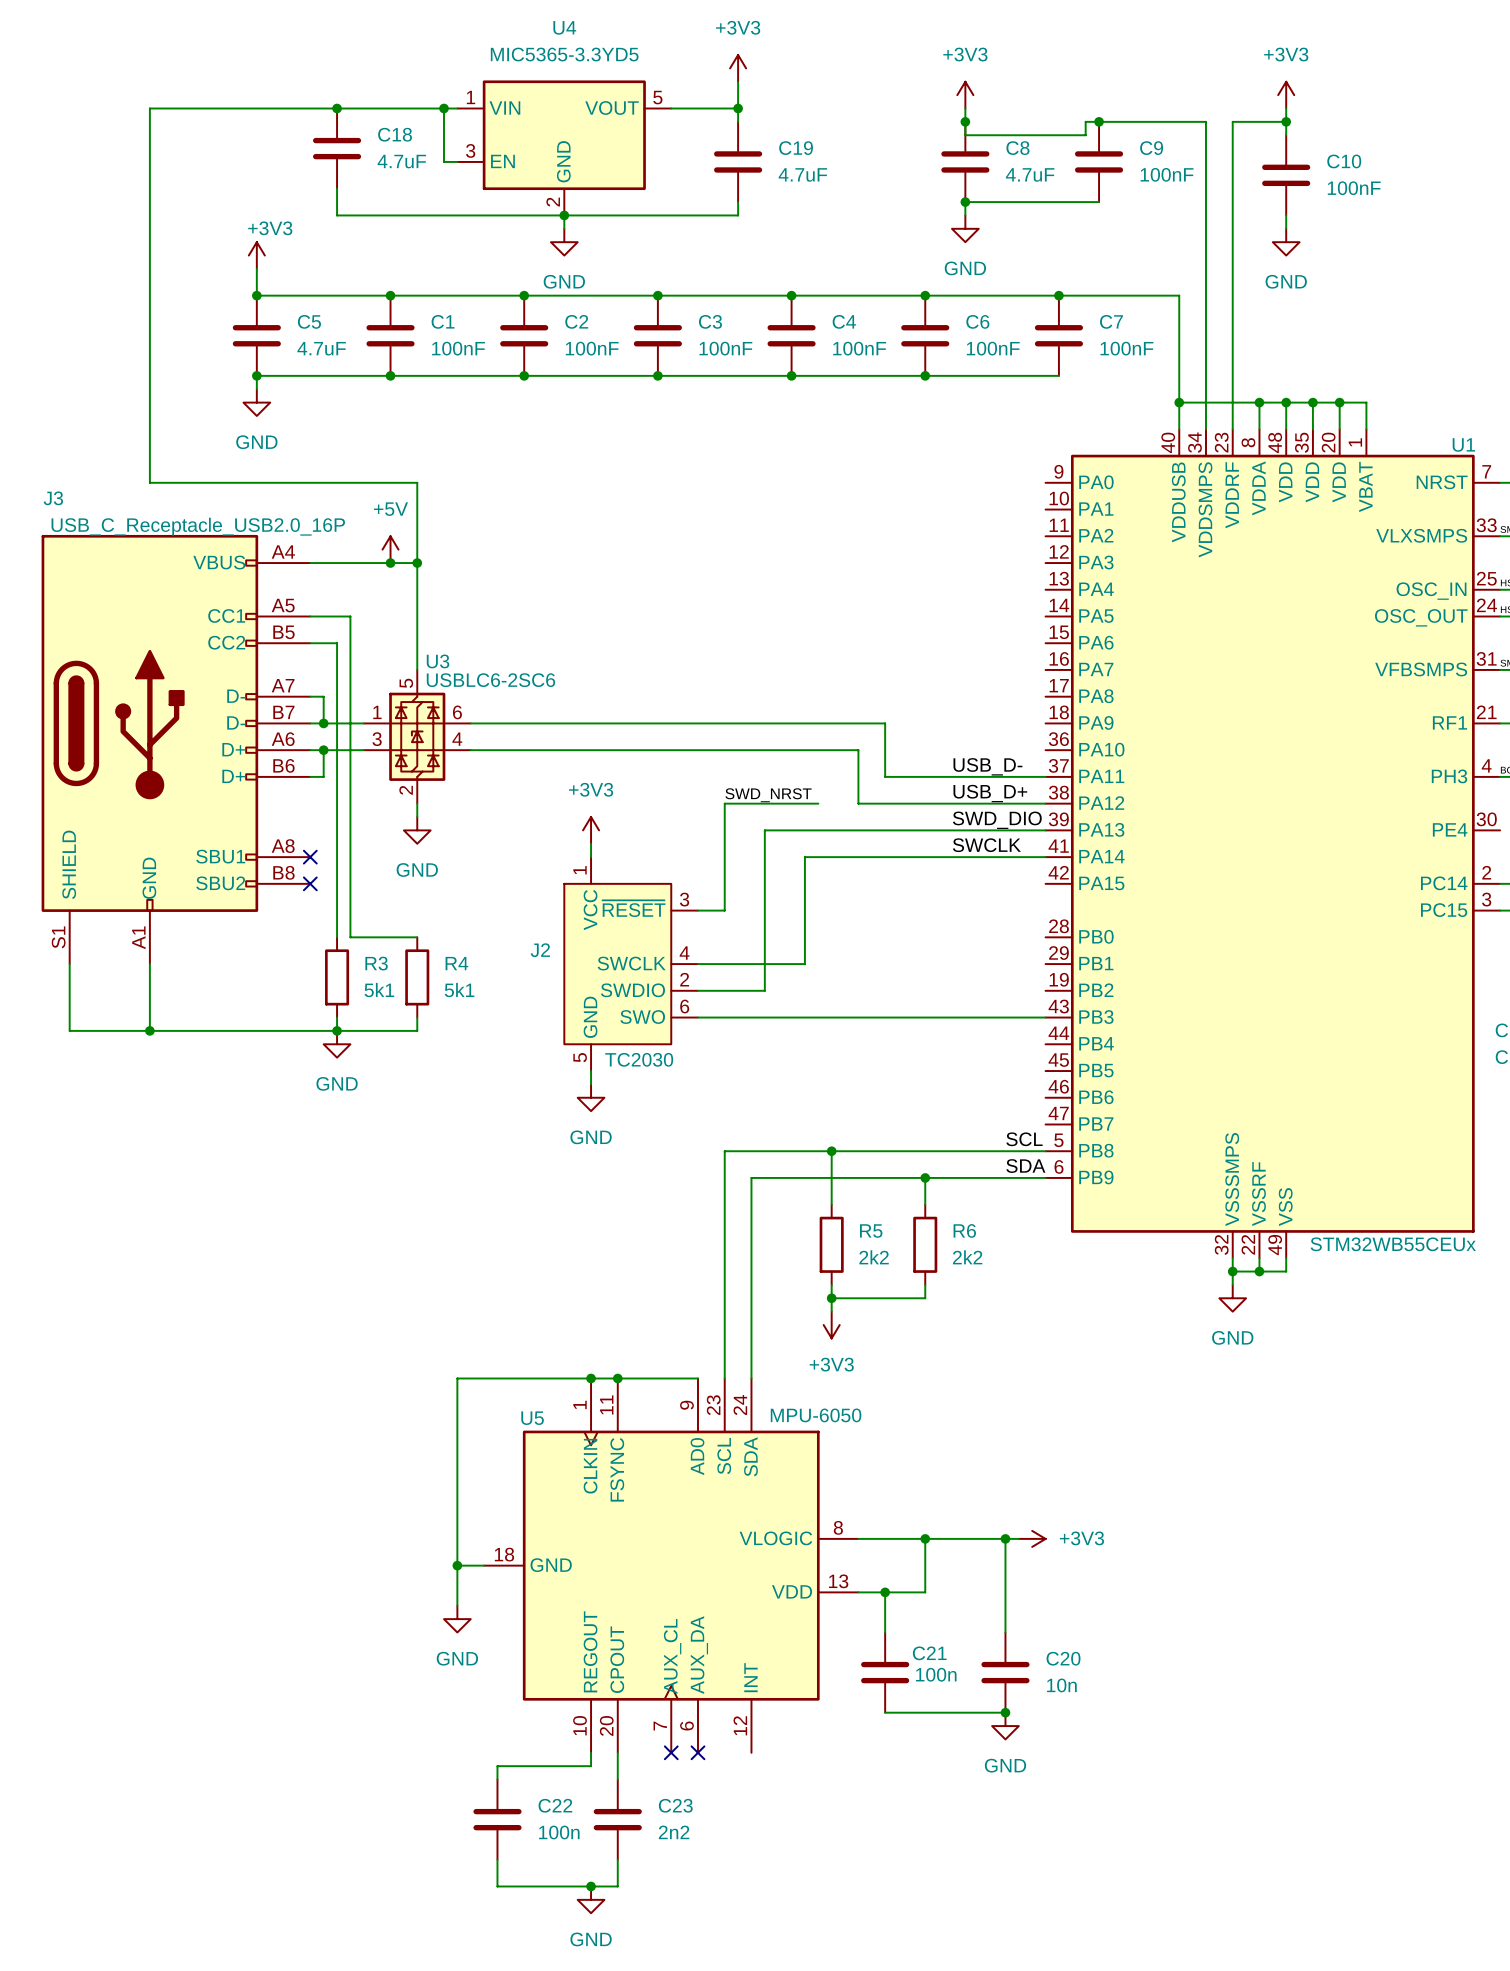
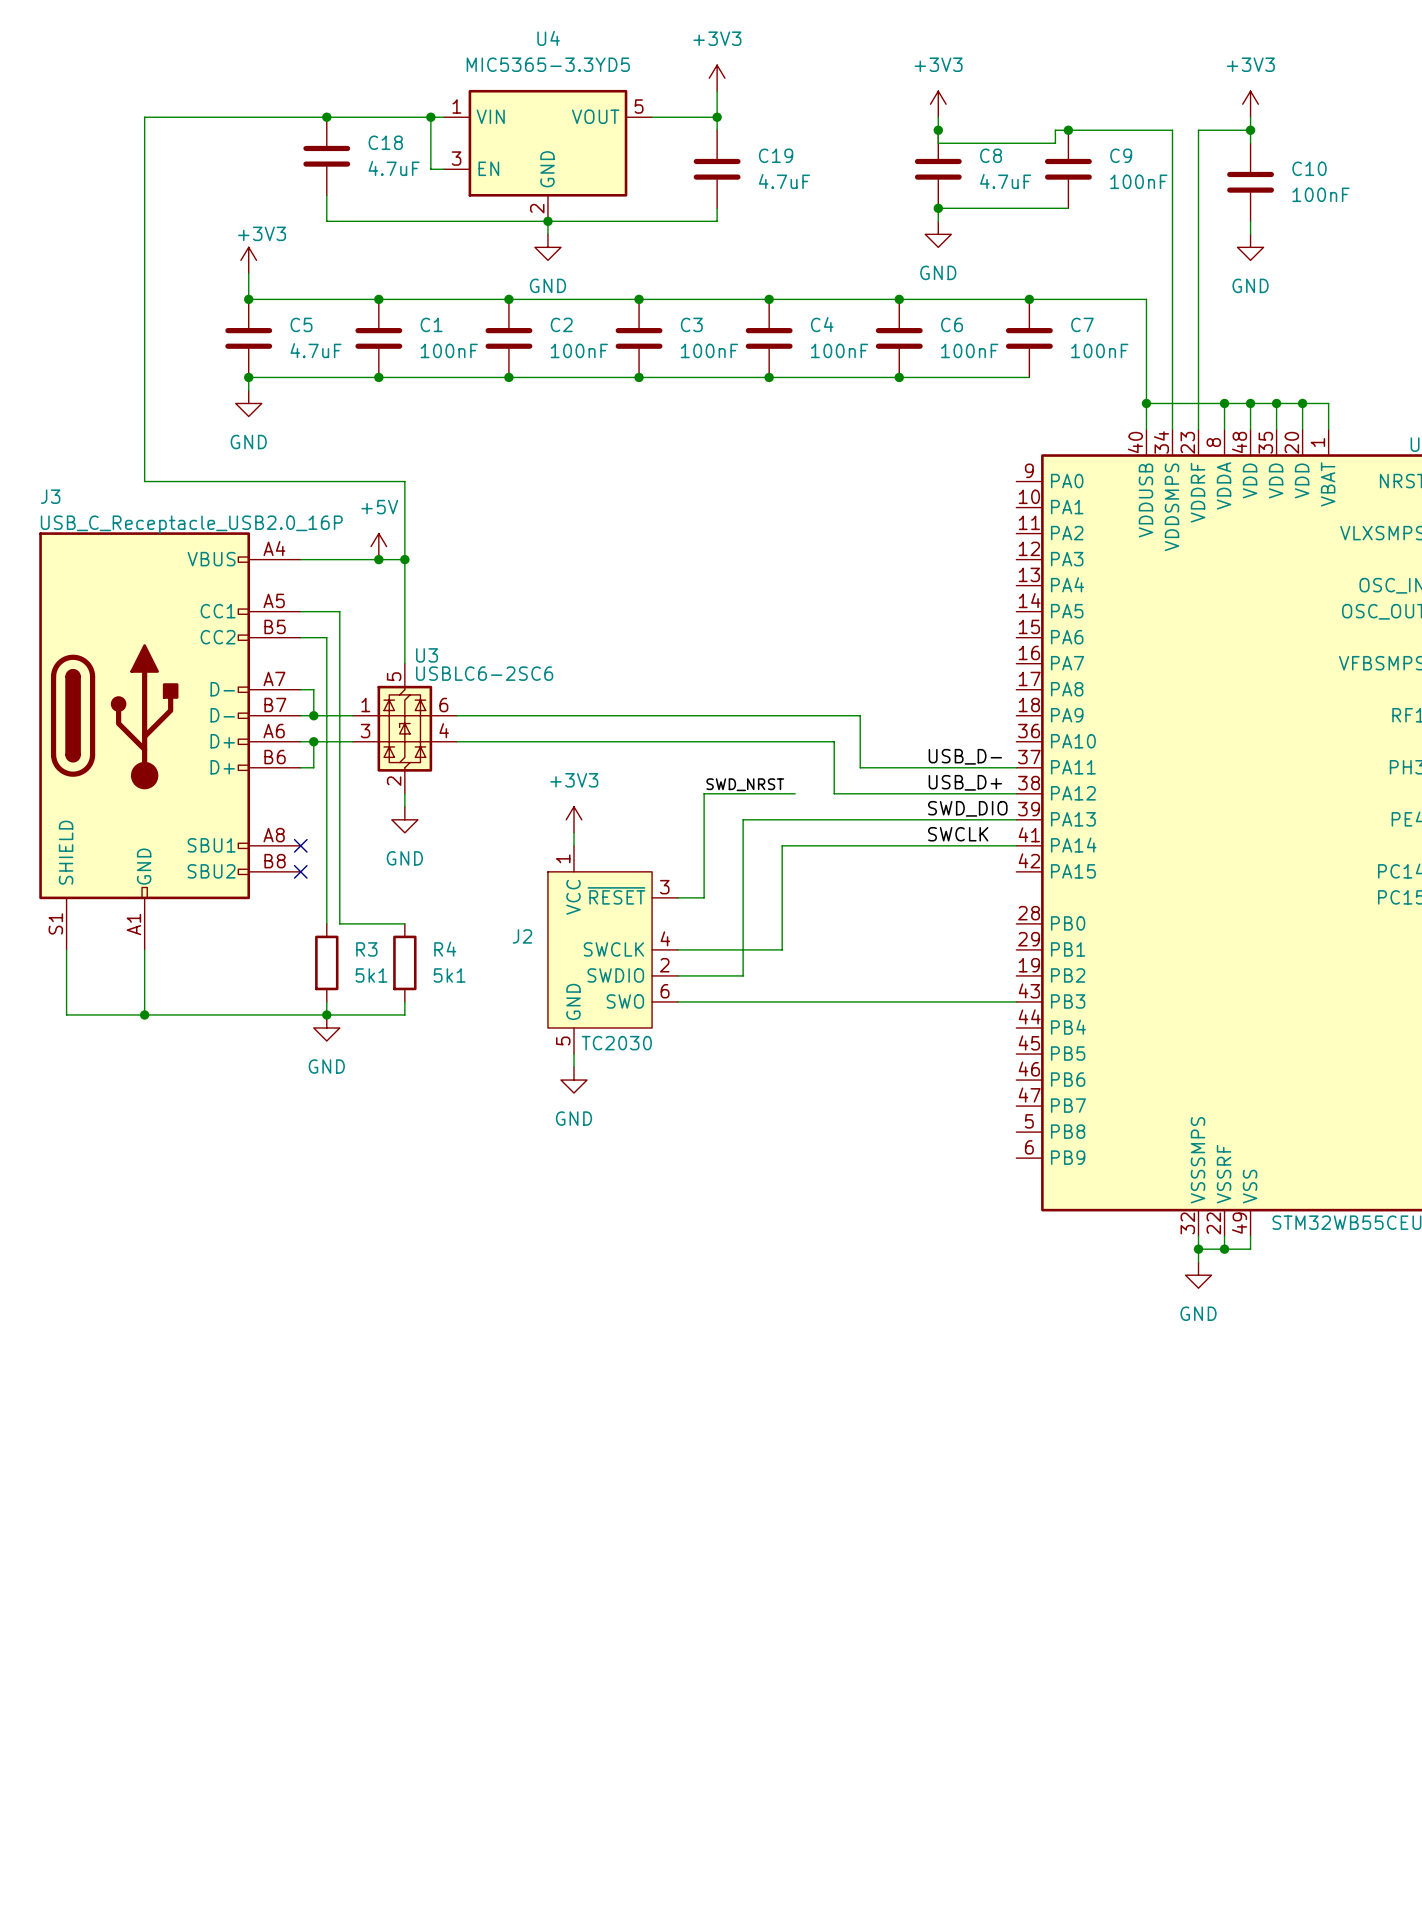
label: SCL (1024, 1139) -> none
wire: (831, 1151) (831, 1204) -> none
junction: (831, 1151) -> none
wire: (1045, 1151) (724, 1151) (724, 1378) -> none
label: SDA (1025, 1166) -> none
wire: (925, 1177) (925, 1204) -> none
junction: (925, 1177) -> none
wire: (1045, 1177) (751, 1177) (751, 1378) -> none
R5: 2k2 (831, 1244) -> none
R6: 2k2 (925, 1244) -> none
wire: (831, 1284) (831, 1311) -> none
wire: (925, 1284) (925, 1298) (831, 1298) -> none
junction: (831, 1298) -> none
power symbol: +3V3 (831, 1325) -> none
junction: (591, 1378) -> none
junction: (617, 1378) -> none
wire: (697, 1378) (457, 1378) (457, 1605) -> none
wire: (858, 1538) (1018, 1538) -> none
wire: (925, 1538) (925, 1592) (858, 1592) -> none
junction: (925, 1538) -> none
wire: (1005, 1538) (1005, 1632) -> none
junction: (1005, 1538) -> none
power symbol: +3V3 (1032, 1538) -> none
wire: (457, 1565) (484, 1565) -> none
junction: (457, 1565) -> none
U5: MPU-6050 (671, 1565) -> none
wire: (885, 1592) (885, 1632) -> none
junction: (885, 1592) -> none
power symbol: GND (457, 1619) -> none
C21: 100n (885, 1672) -> none
C20: 10n (1005, 1672) -> none
wire: (885, 1712) (1005, 1712) -> none
junction: (1005, 1712) -> none
power symbol: GND (1005, 1726) -> none
wire: (591, 1752) (591, 1766) (497, 1766) (497, 1779) -> none
wire: (617, 1752) (617, 1779) -> none
no-connect mark: (671, 1752) -> none
no-connect mark: (697, 1752) -> none
C22: 100n (497, 1819) -> none
C23: 2n2 (617, 1819) -> none
wire: (497, 1859) (497, 1886) (617, 1886) (617, 1859) -> none
junction: (591, 1886) -> none
power symbol: GND (591, 1899) -> none

